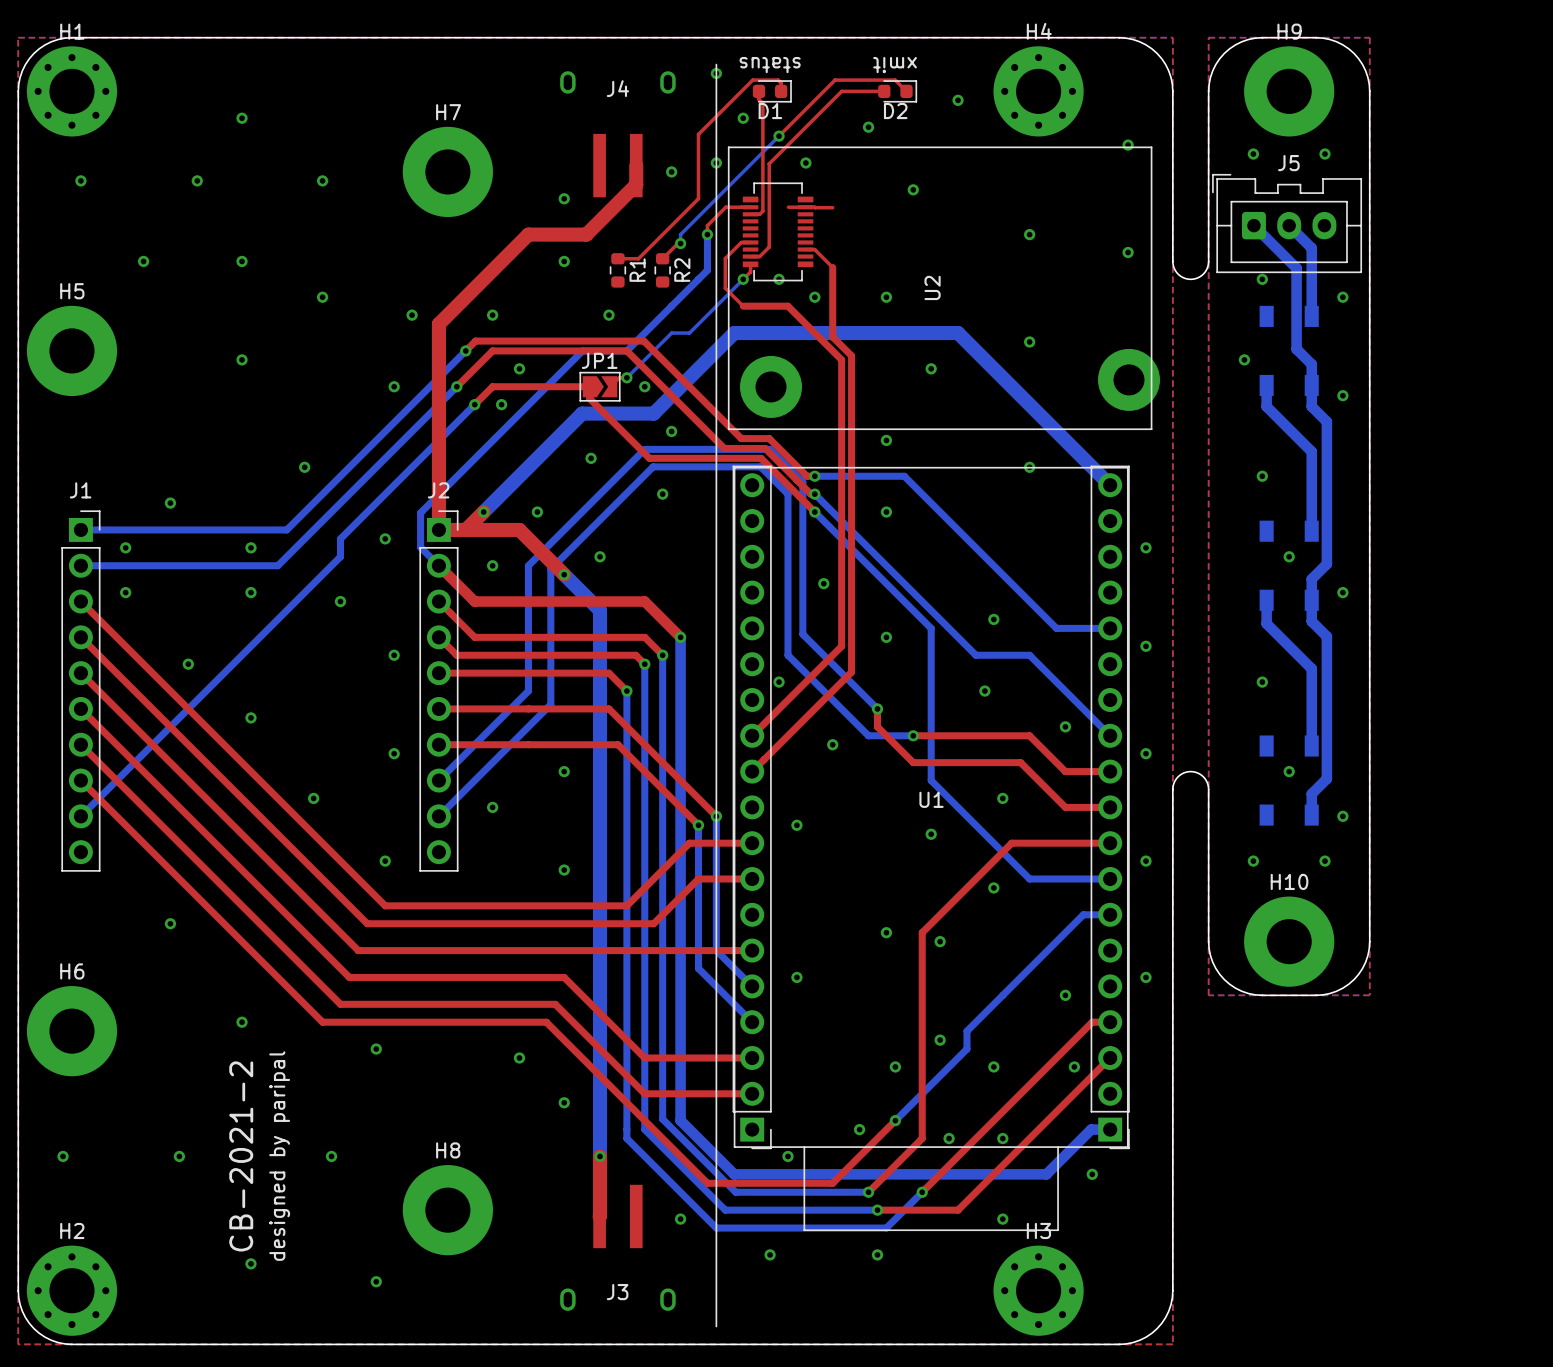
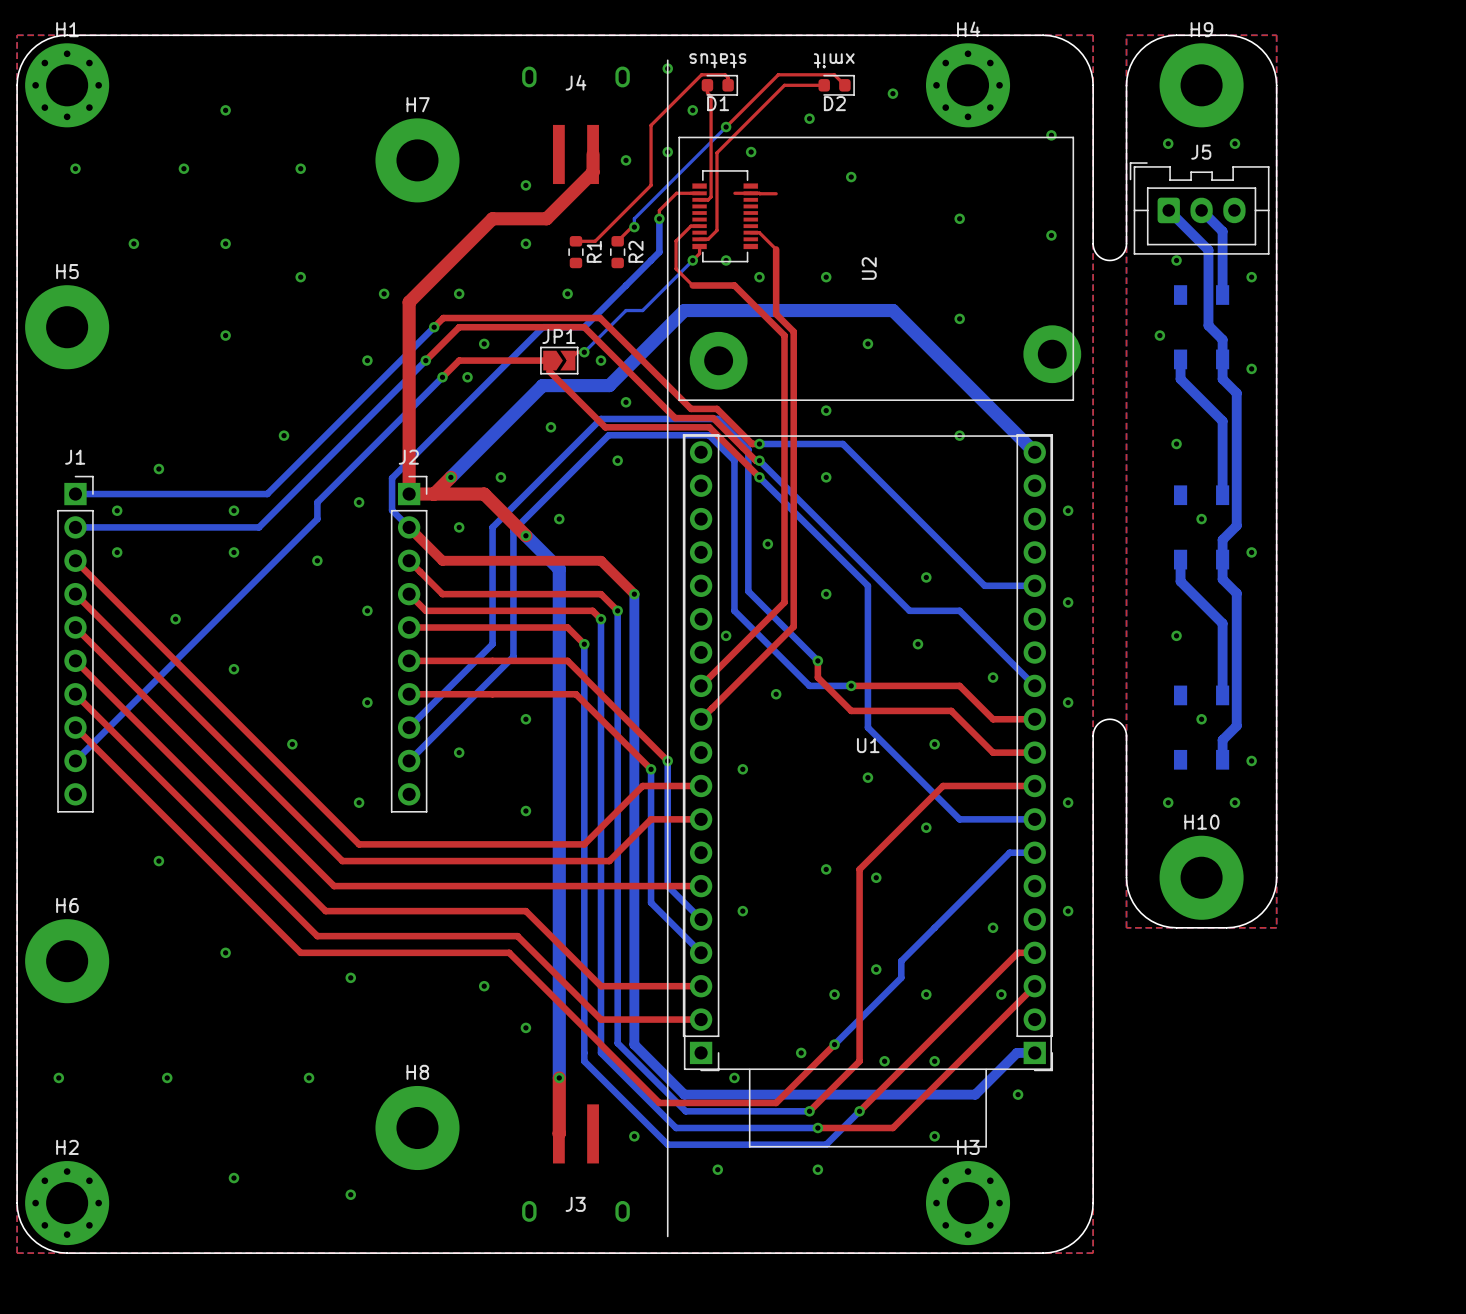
text: CB-2021-2 (241, 1156) -> none
text: designed by paripal (279, 1156) -> none

